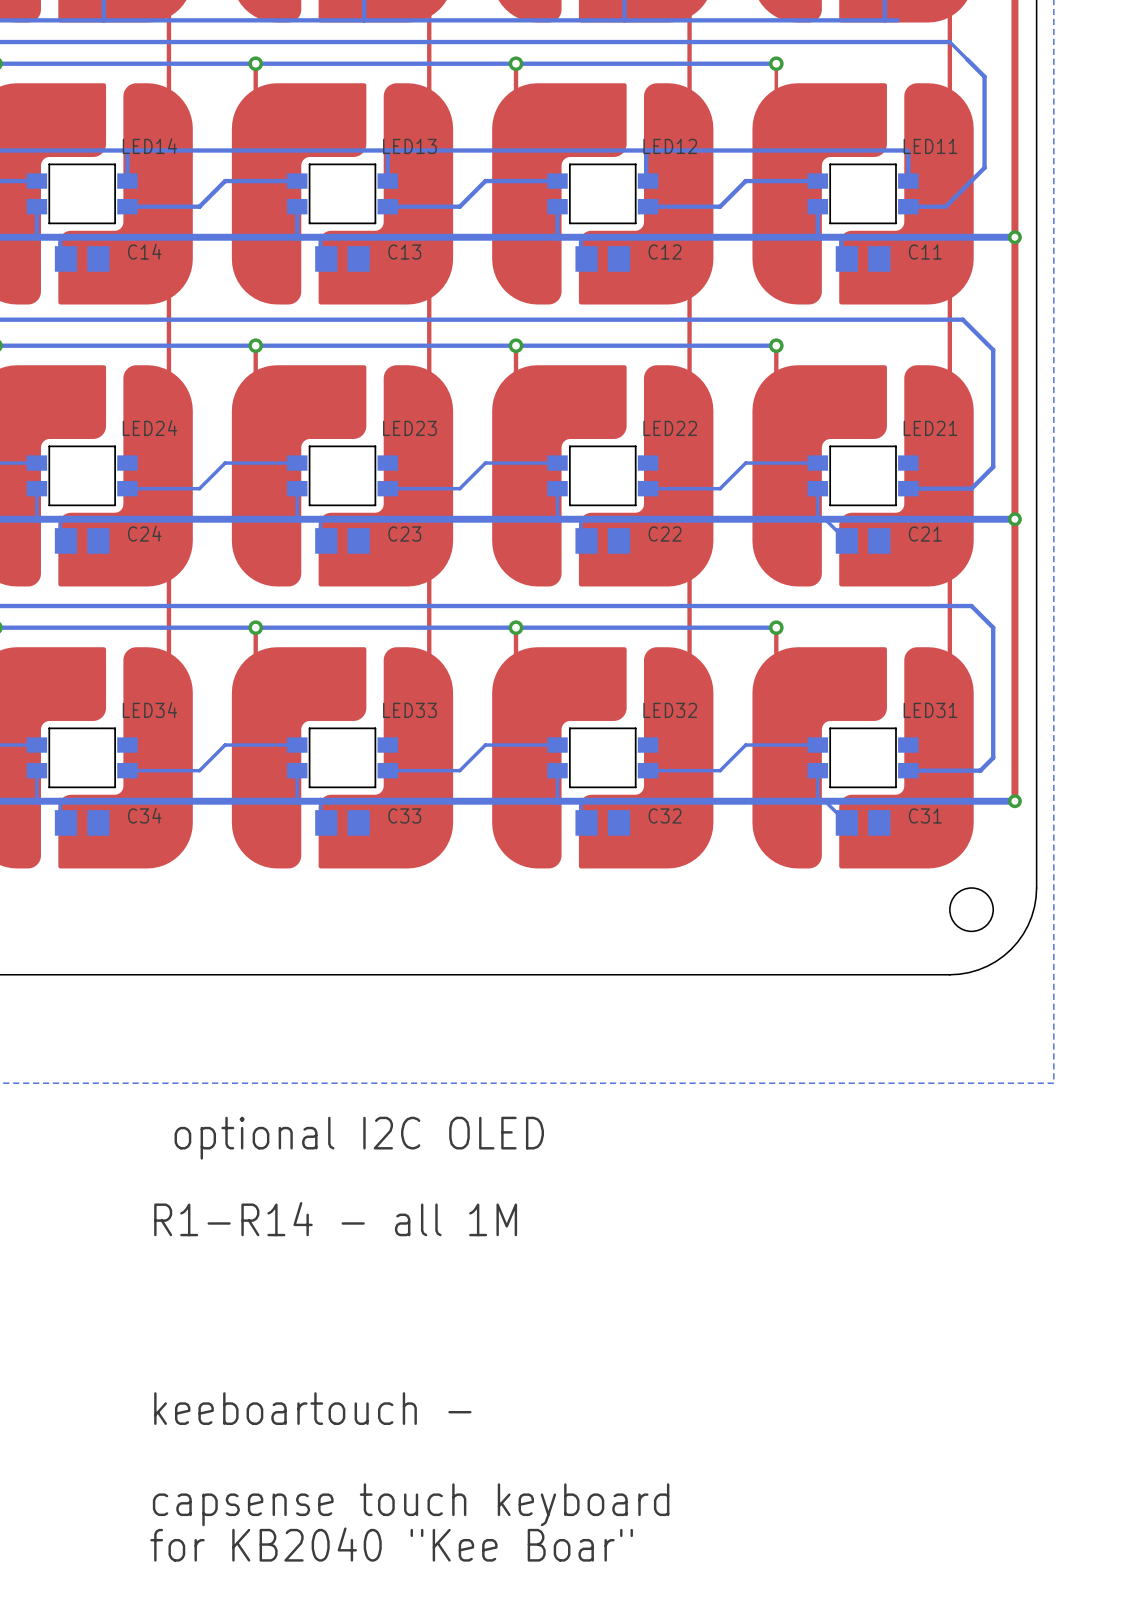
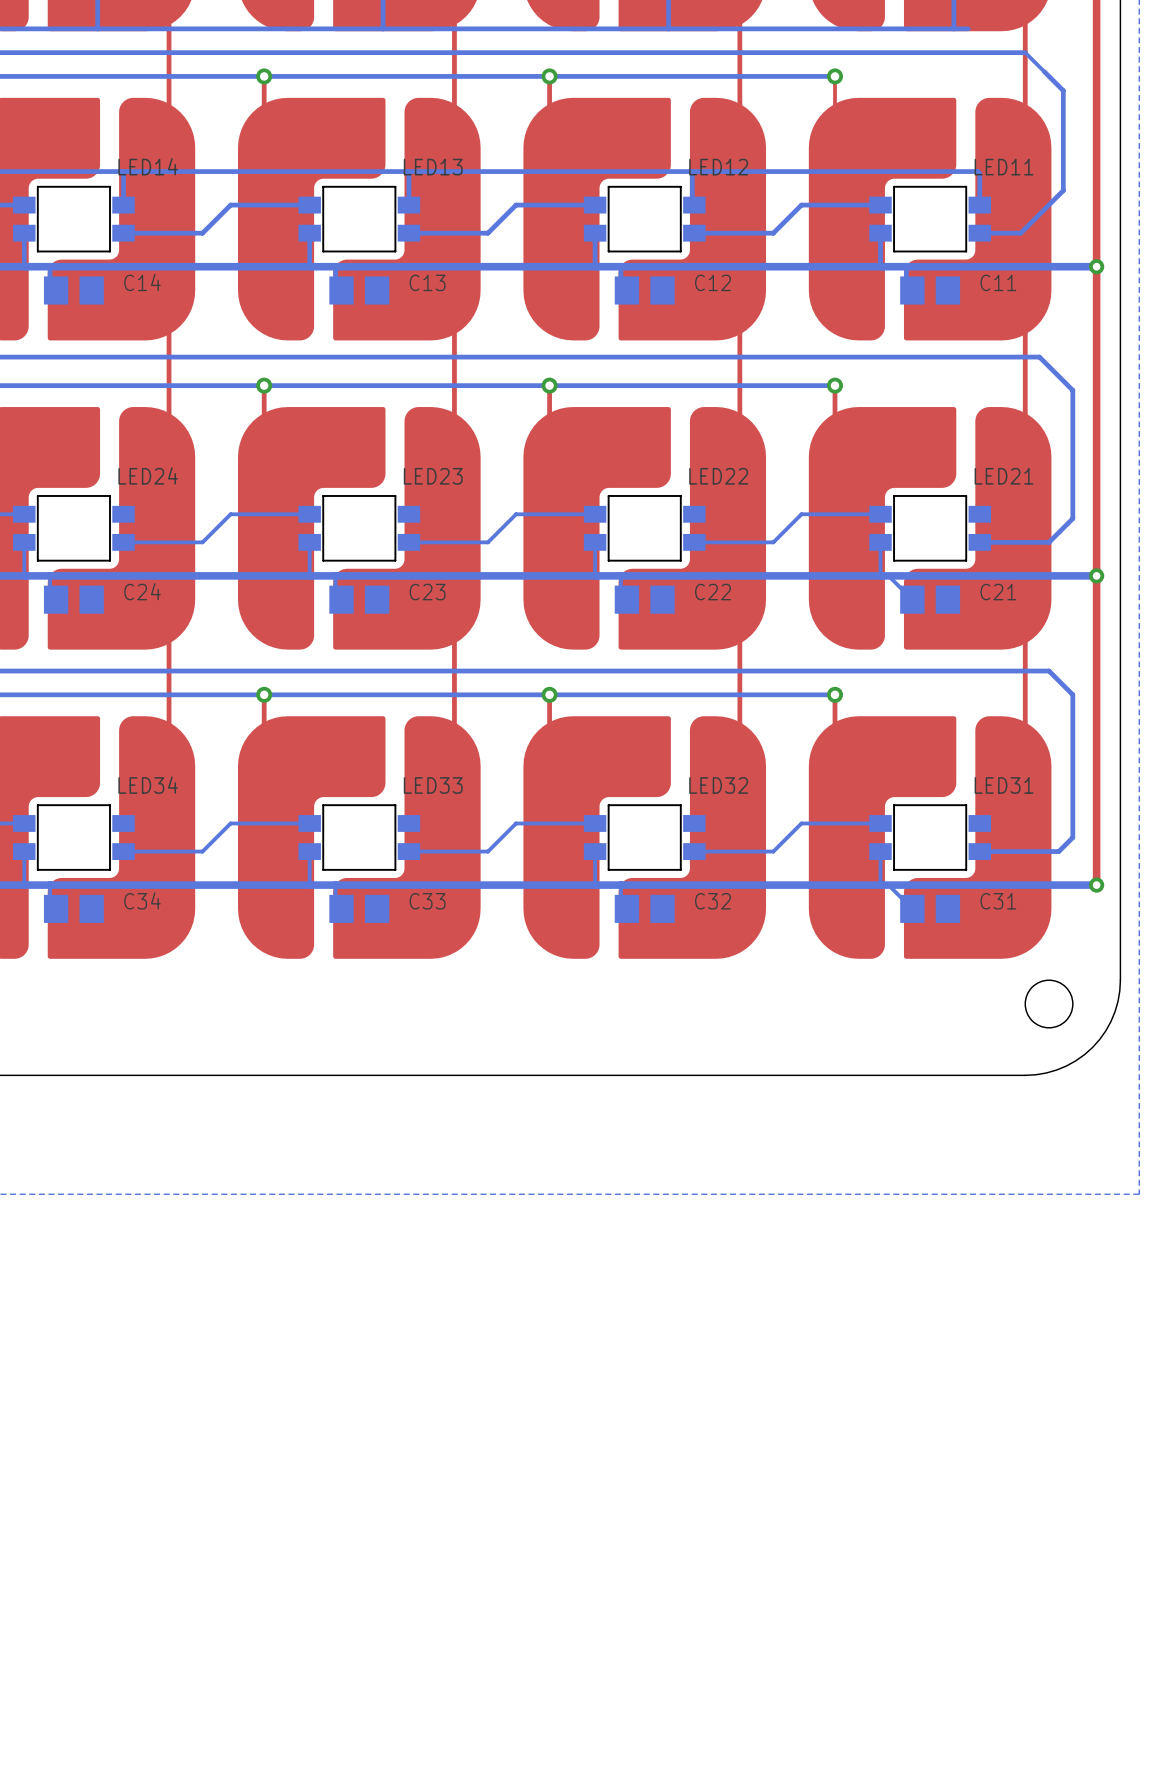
text: optional I2C OLED (359, 1138) -> none
text: R1-R14 - all 1M (335, 1219) -> none
text: keeboartouch - (312, 1408) -> none
text: capsense touch keyboard (411, 1504) -> none
text: for KB2040 "Kee Boar" (391, 1544) -> none

